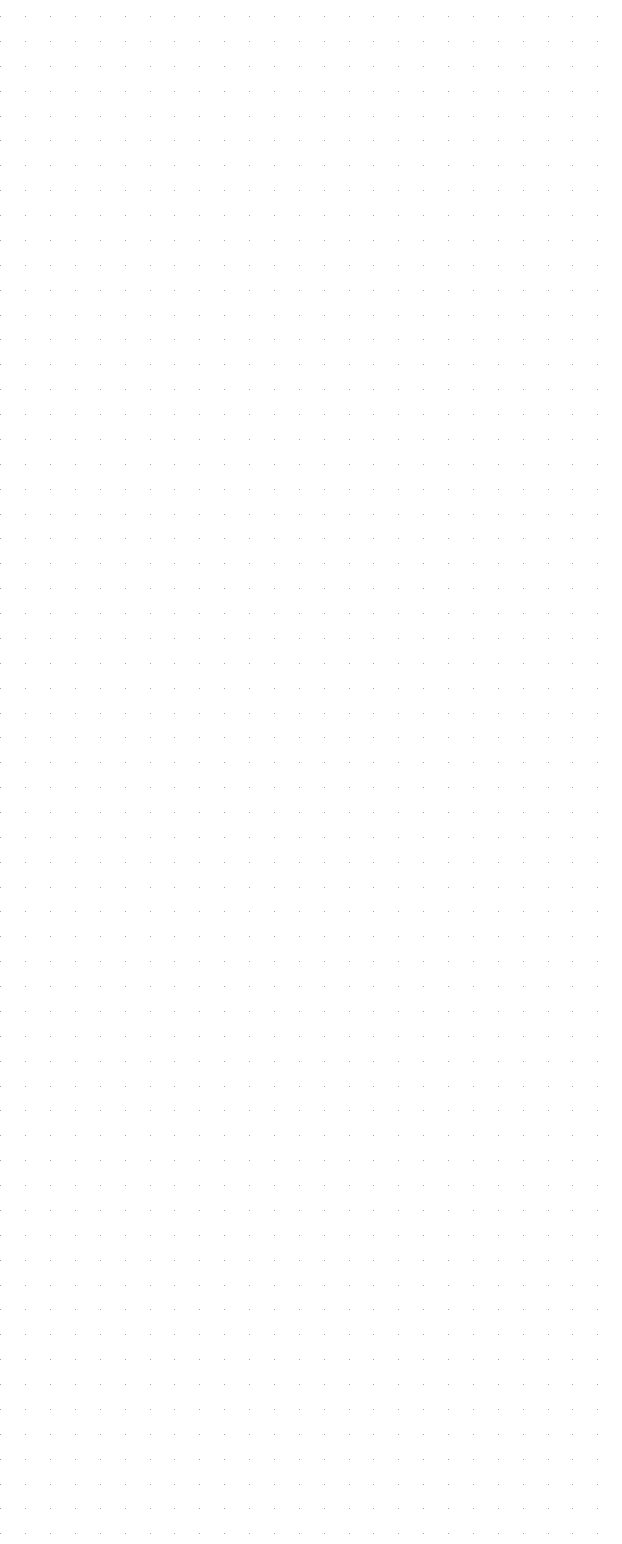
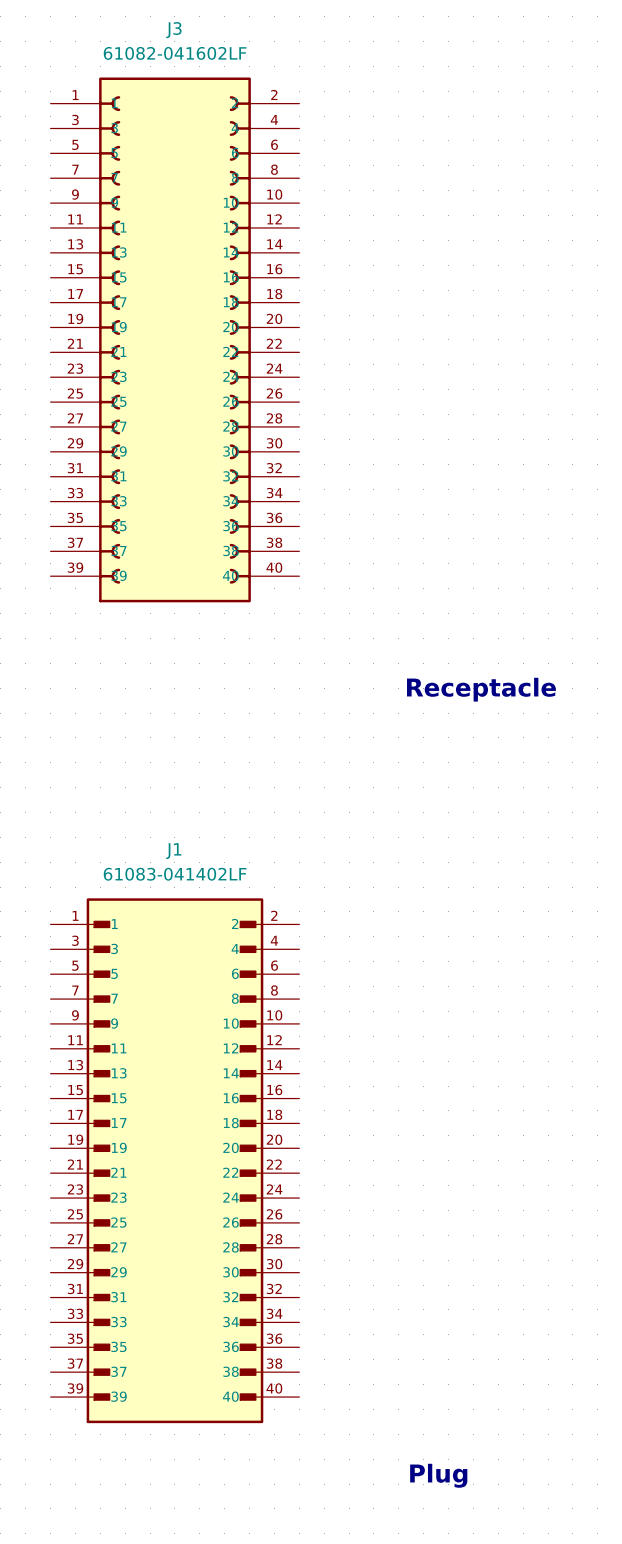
J3: none -> 61082-041602LF (174, 339)
text: none -> Receptacle (481, 689)
J1: none -> 61083-041402LF (174, 1160)
text: none -> Plug (438, 1475)

